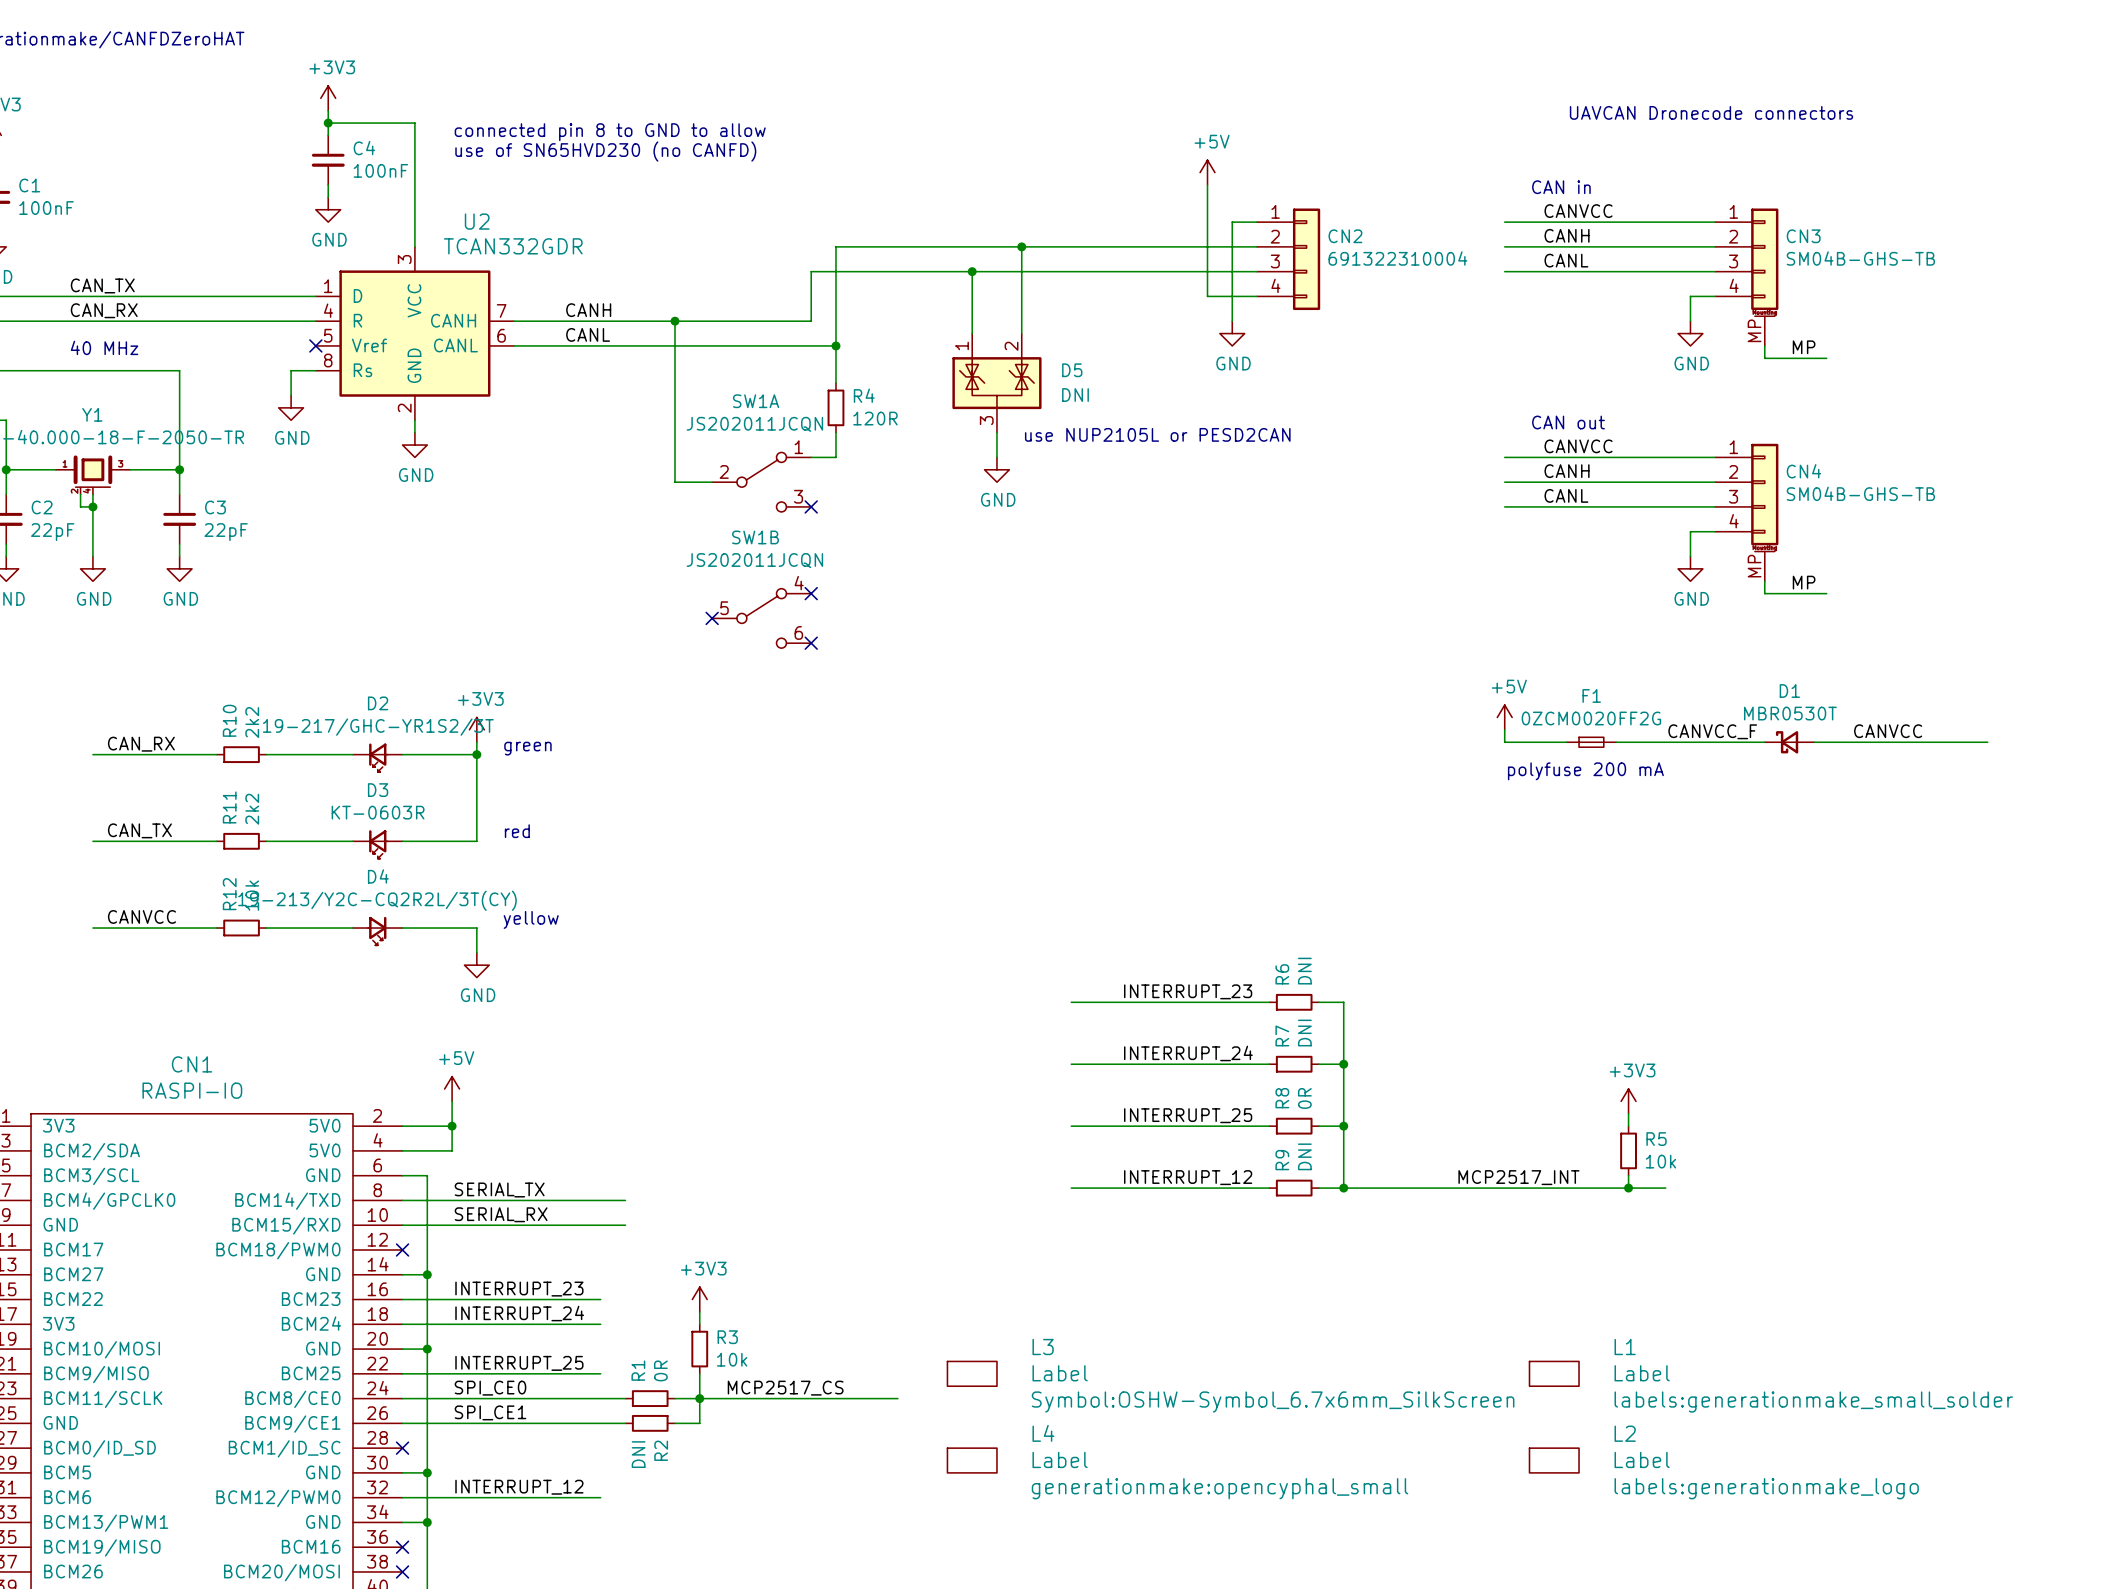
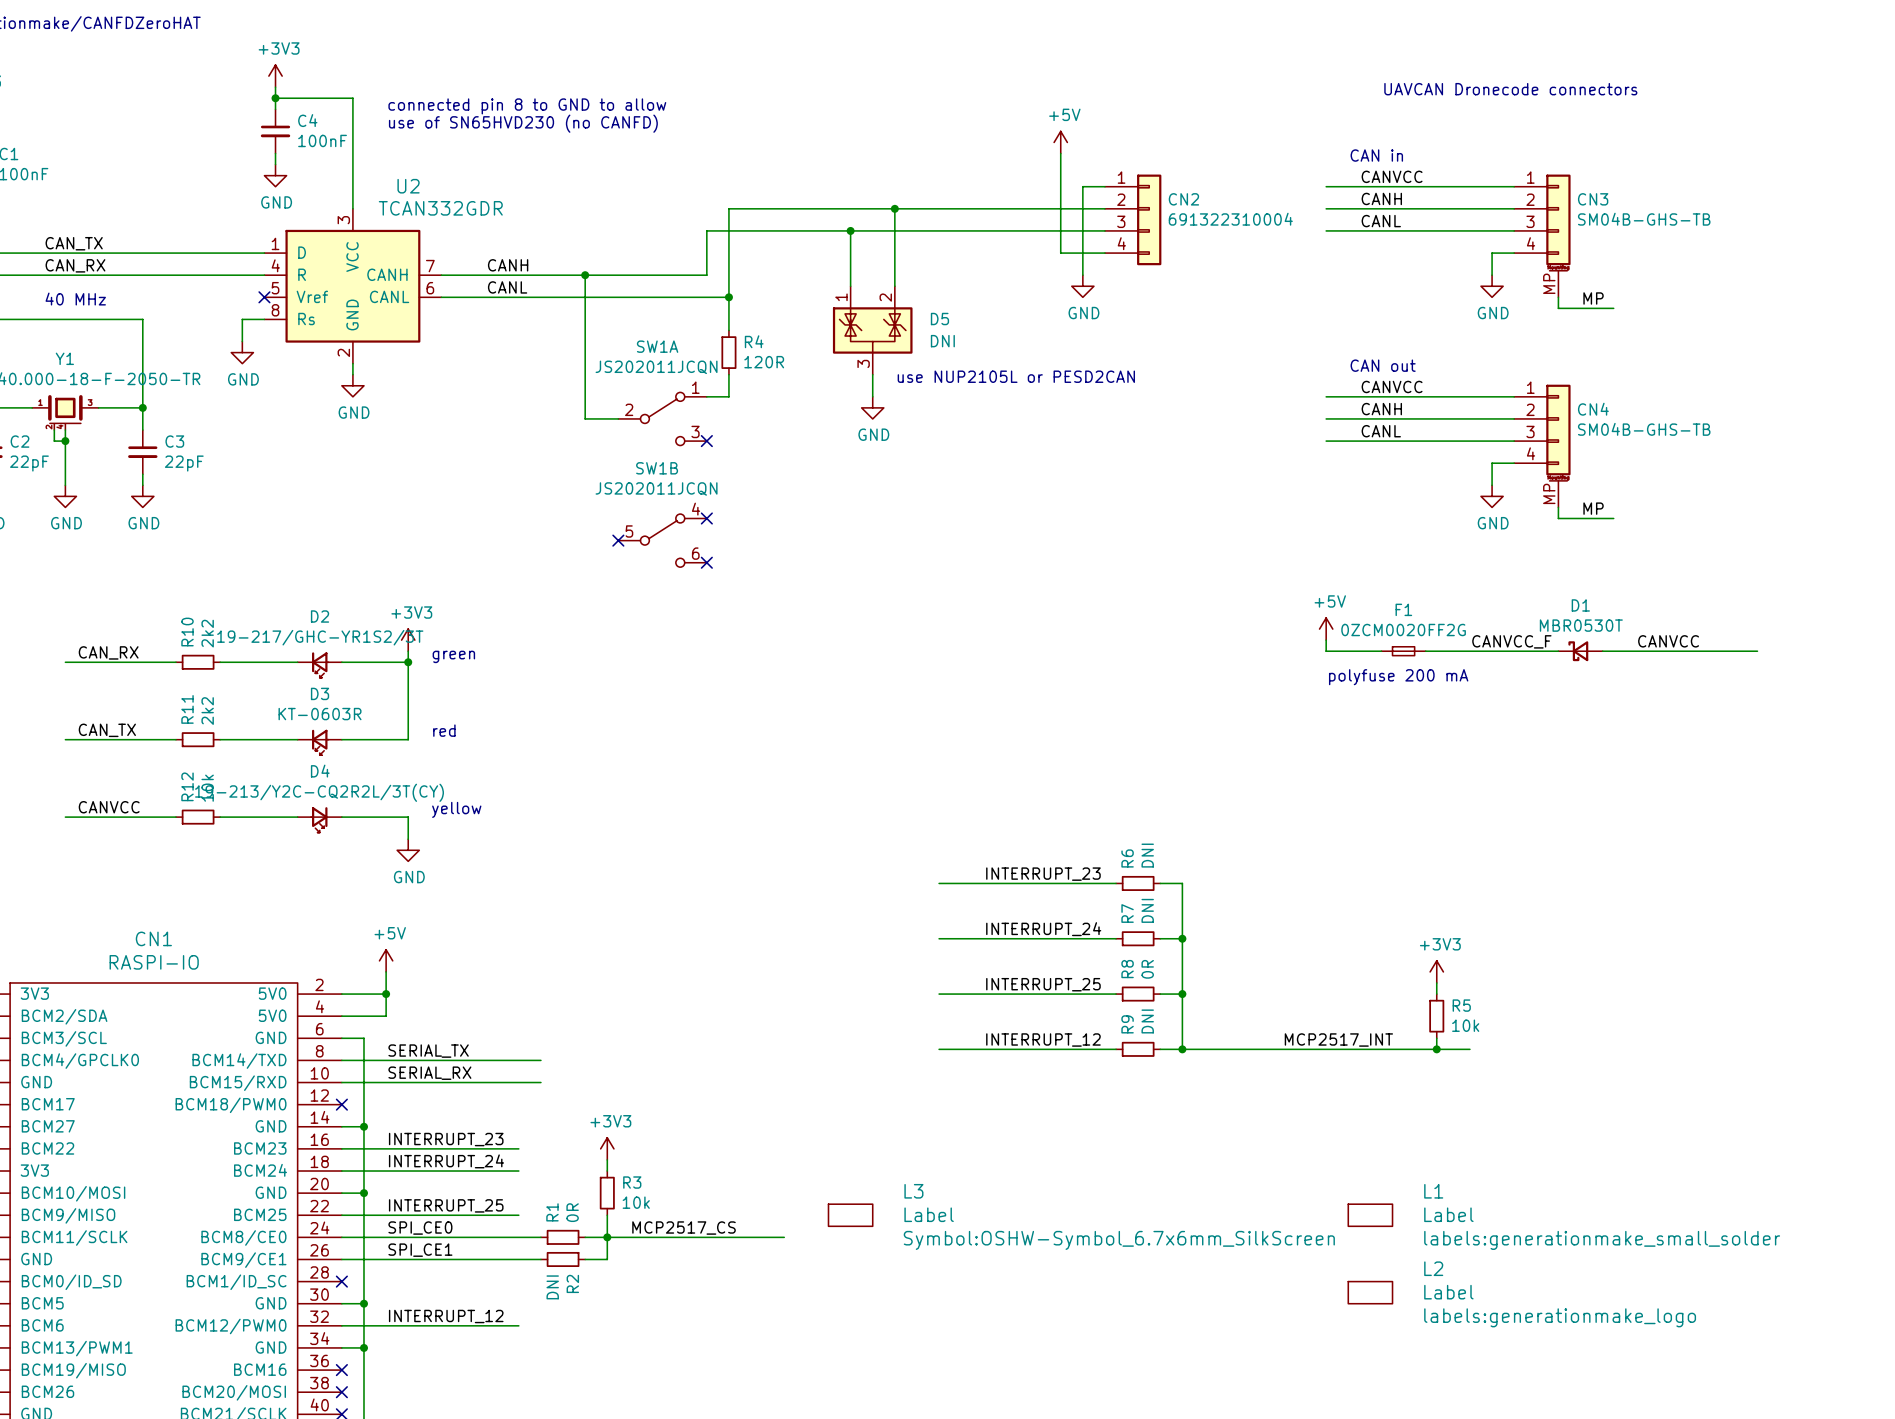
L4: Label (972, 1460) -> none

